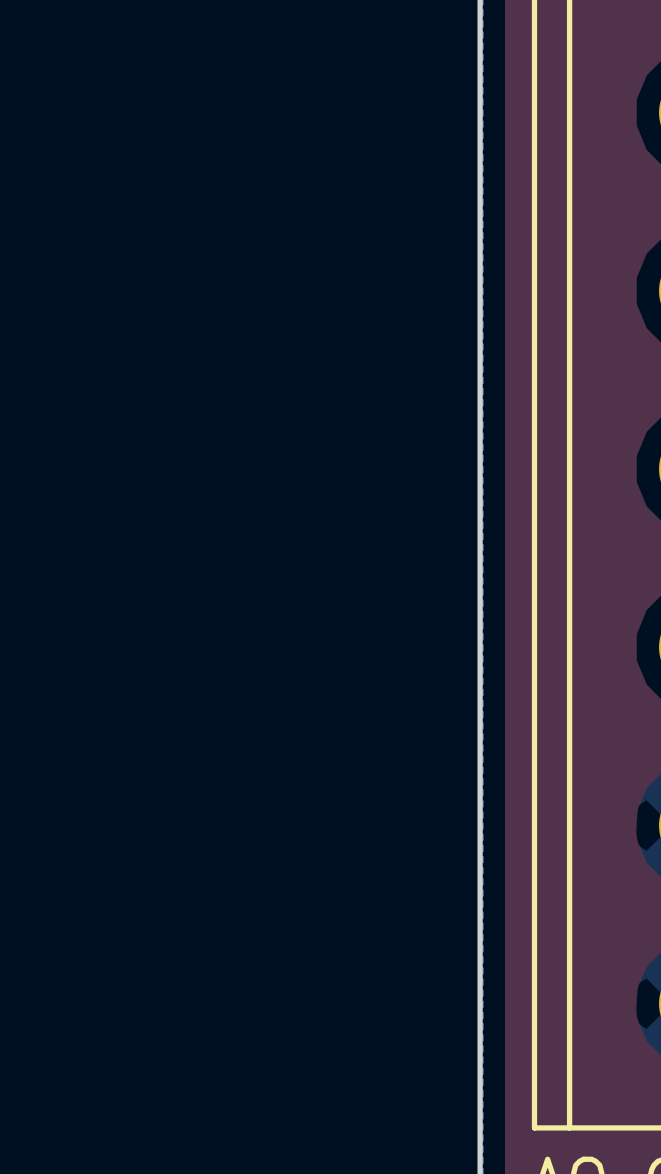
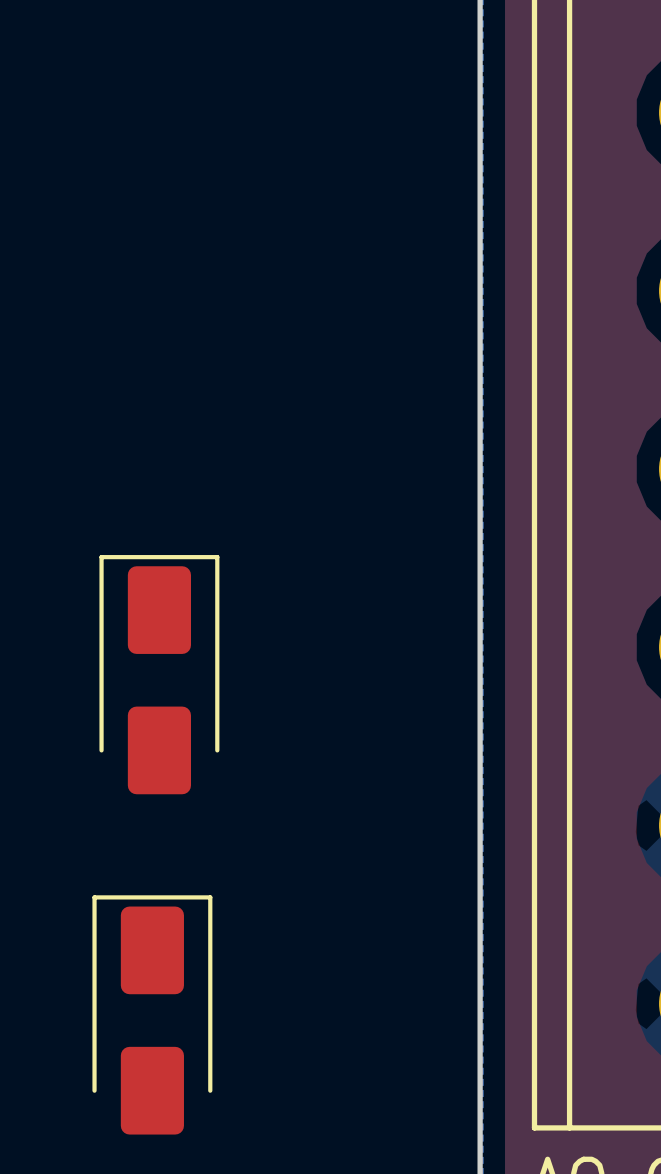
part: none -> (159, 674)
part: none -> (152, 1014)

